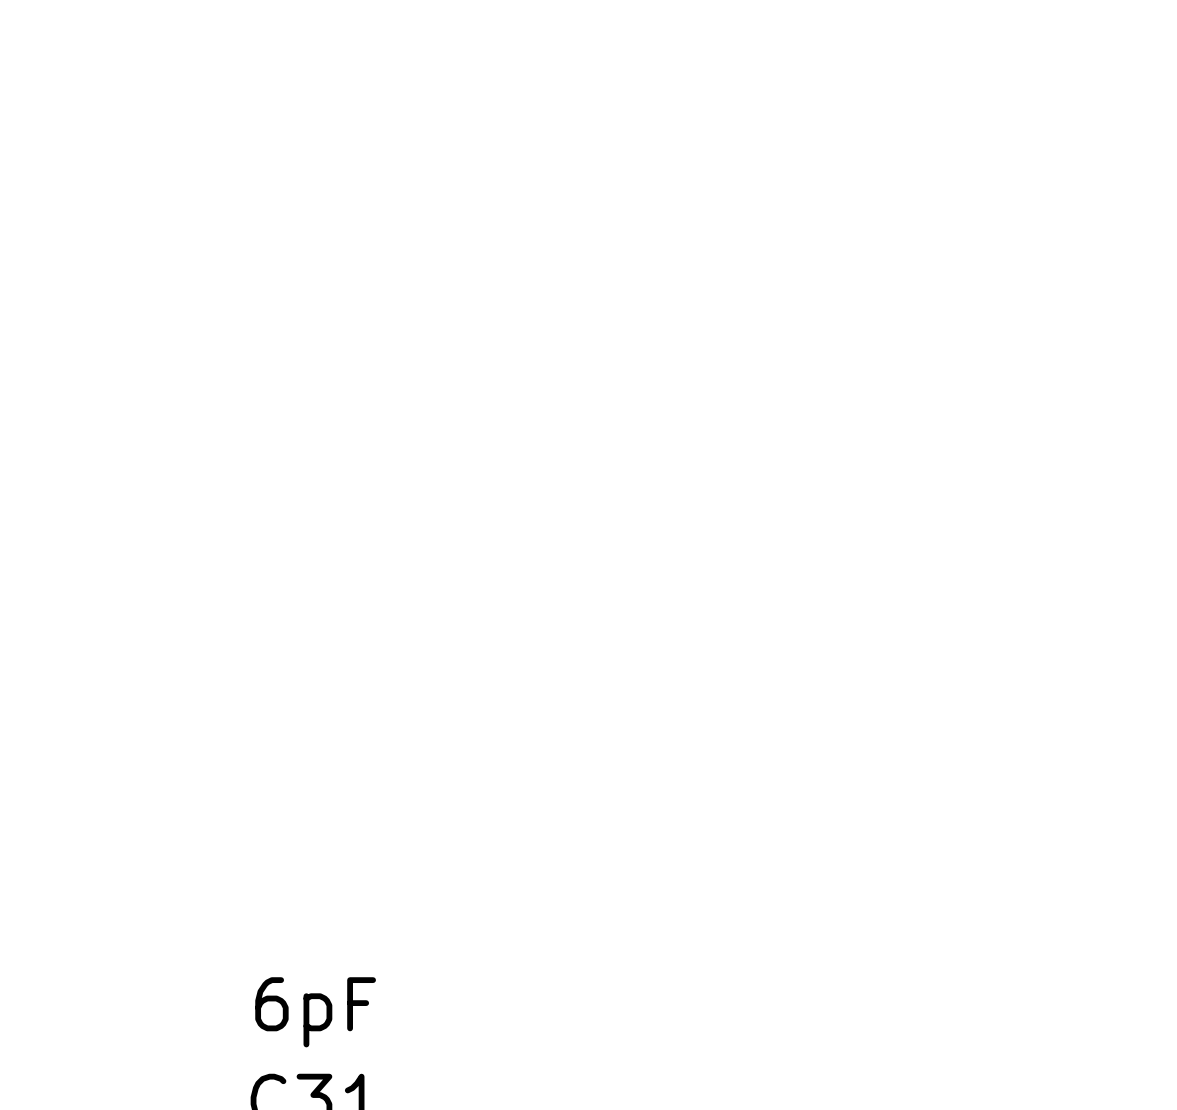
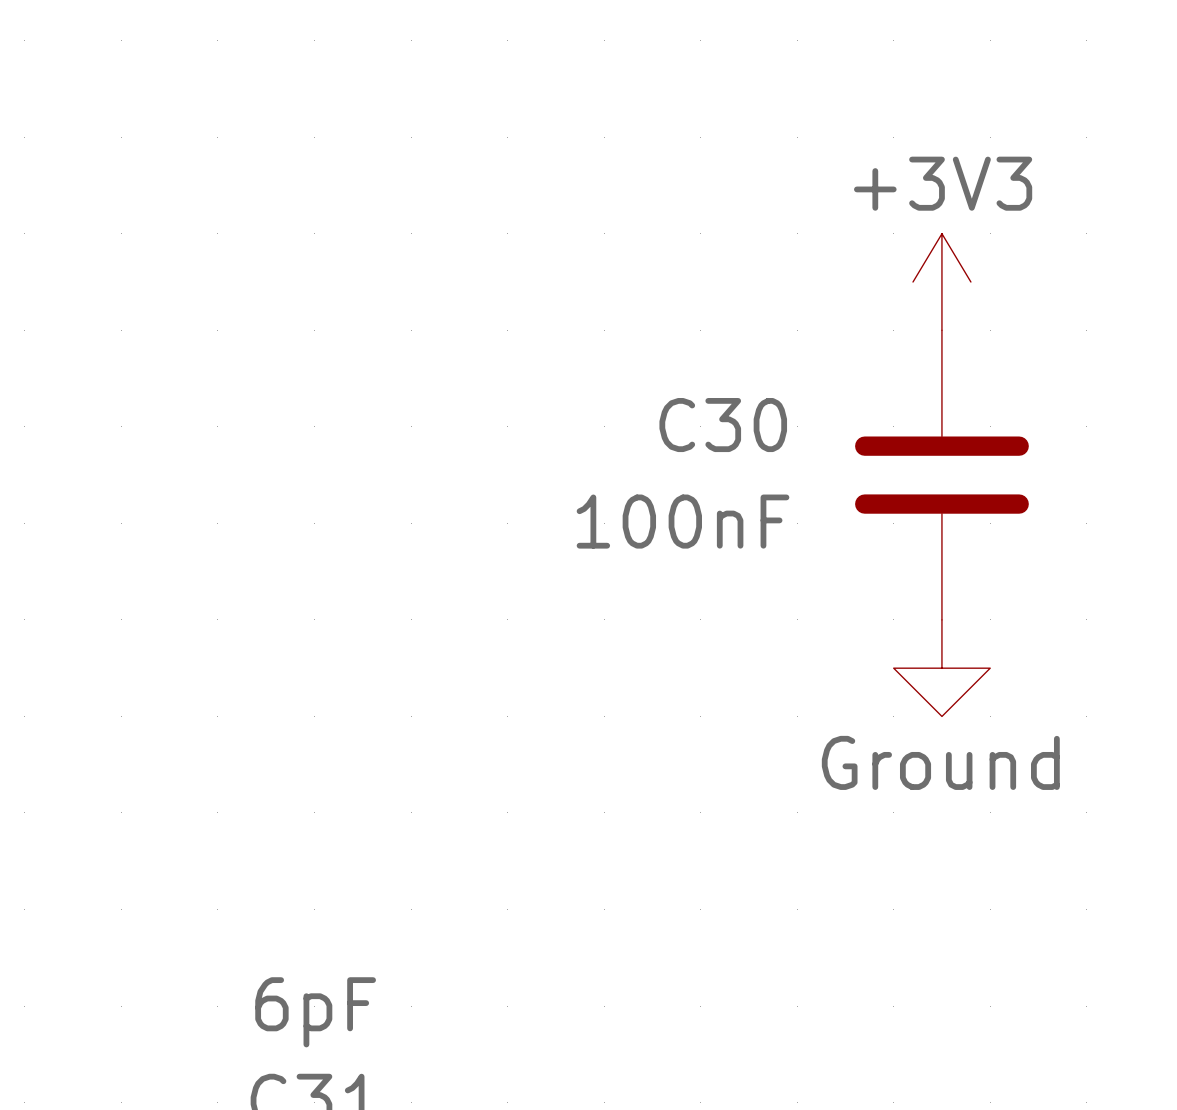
power symbol: none -> +3V3 (941, 282)
C30: none -> 100nF (941, 475)
power symbol: none -> Ground (941, 668)

